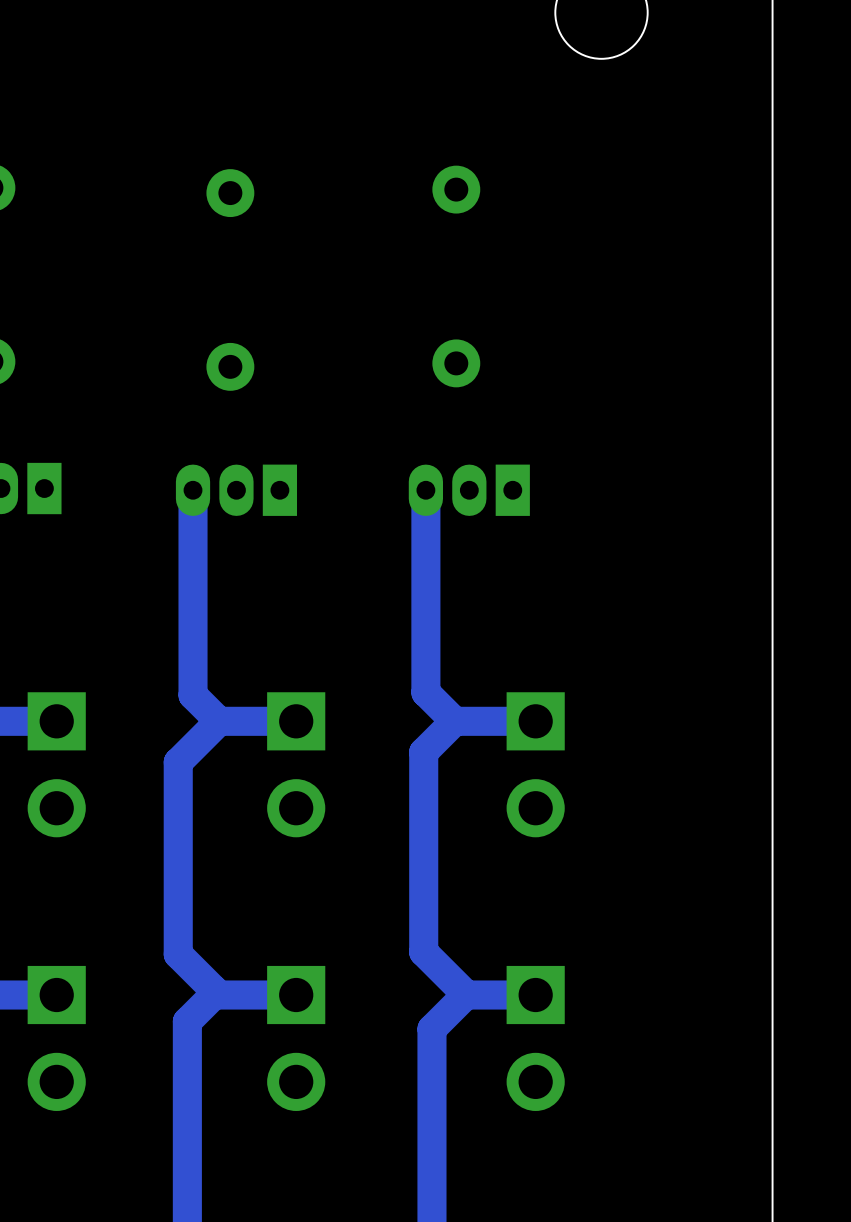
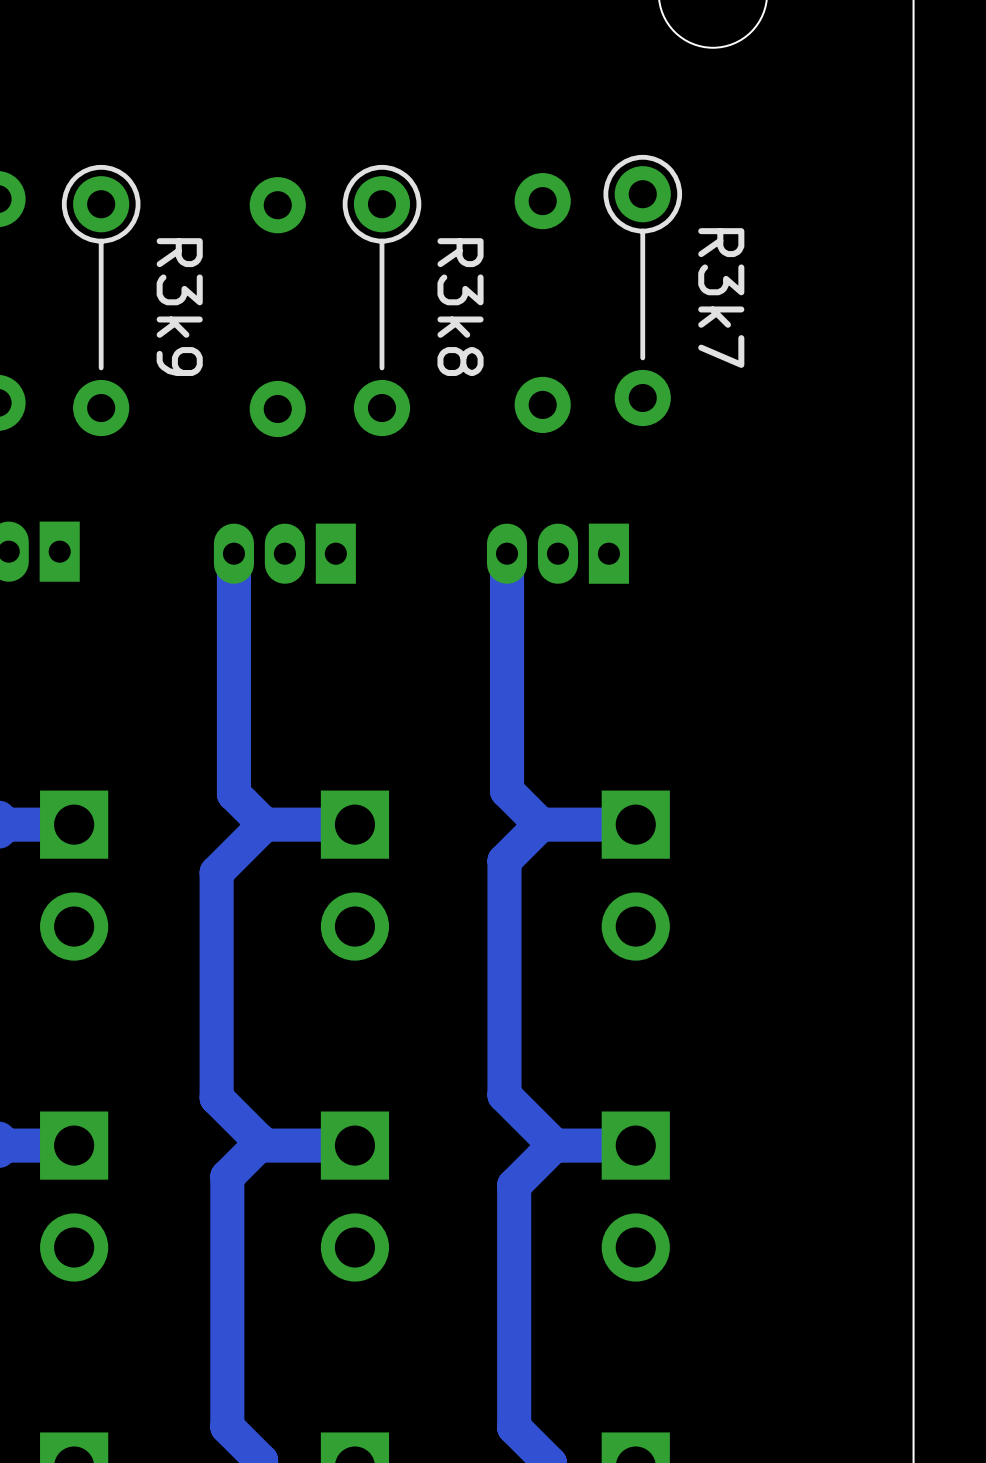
R3k7: none -> (642, 290)
R3k9: none -> (101, 300)
R3k8: none -> (381, 300)

